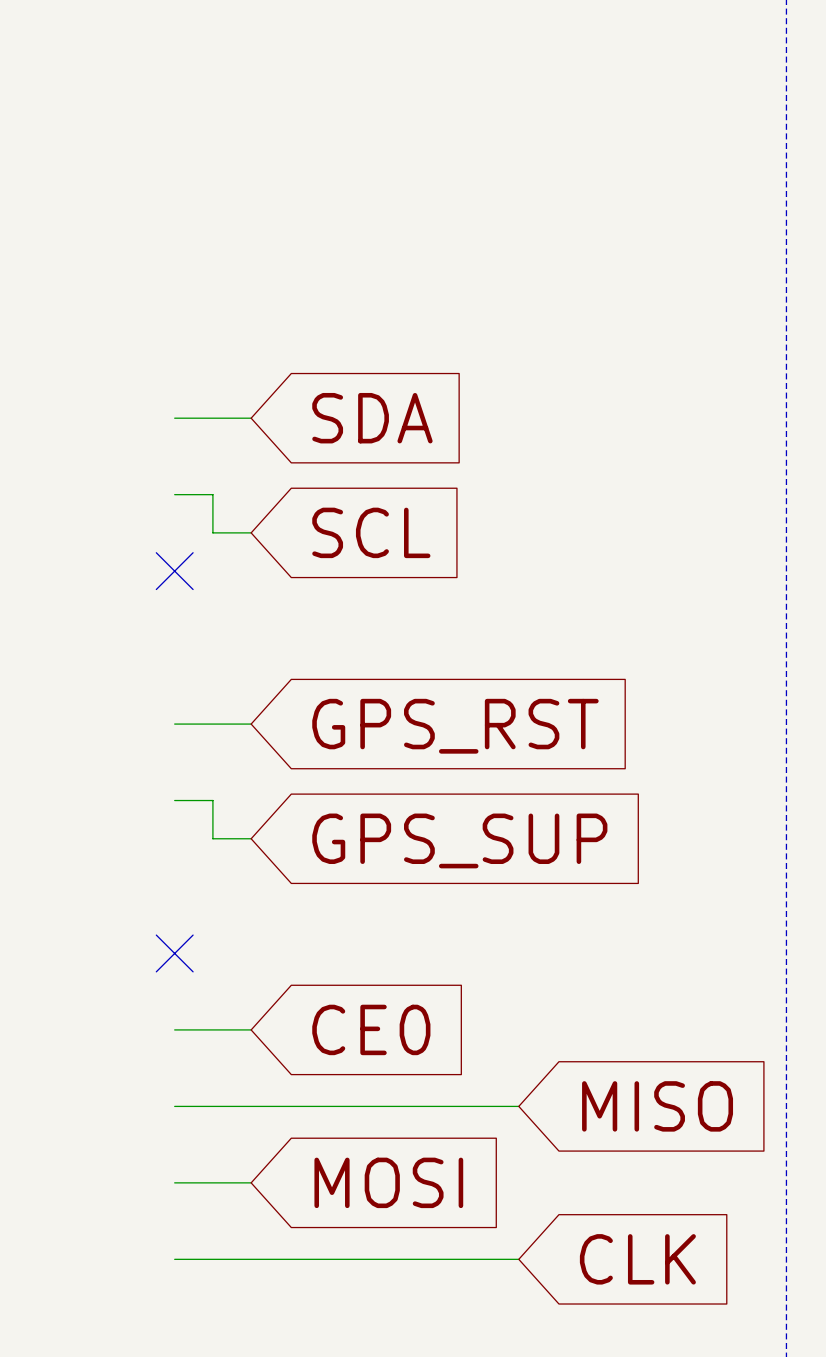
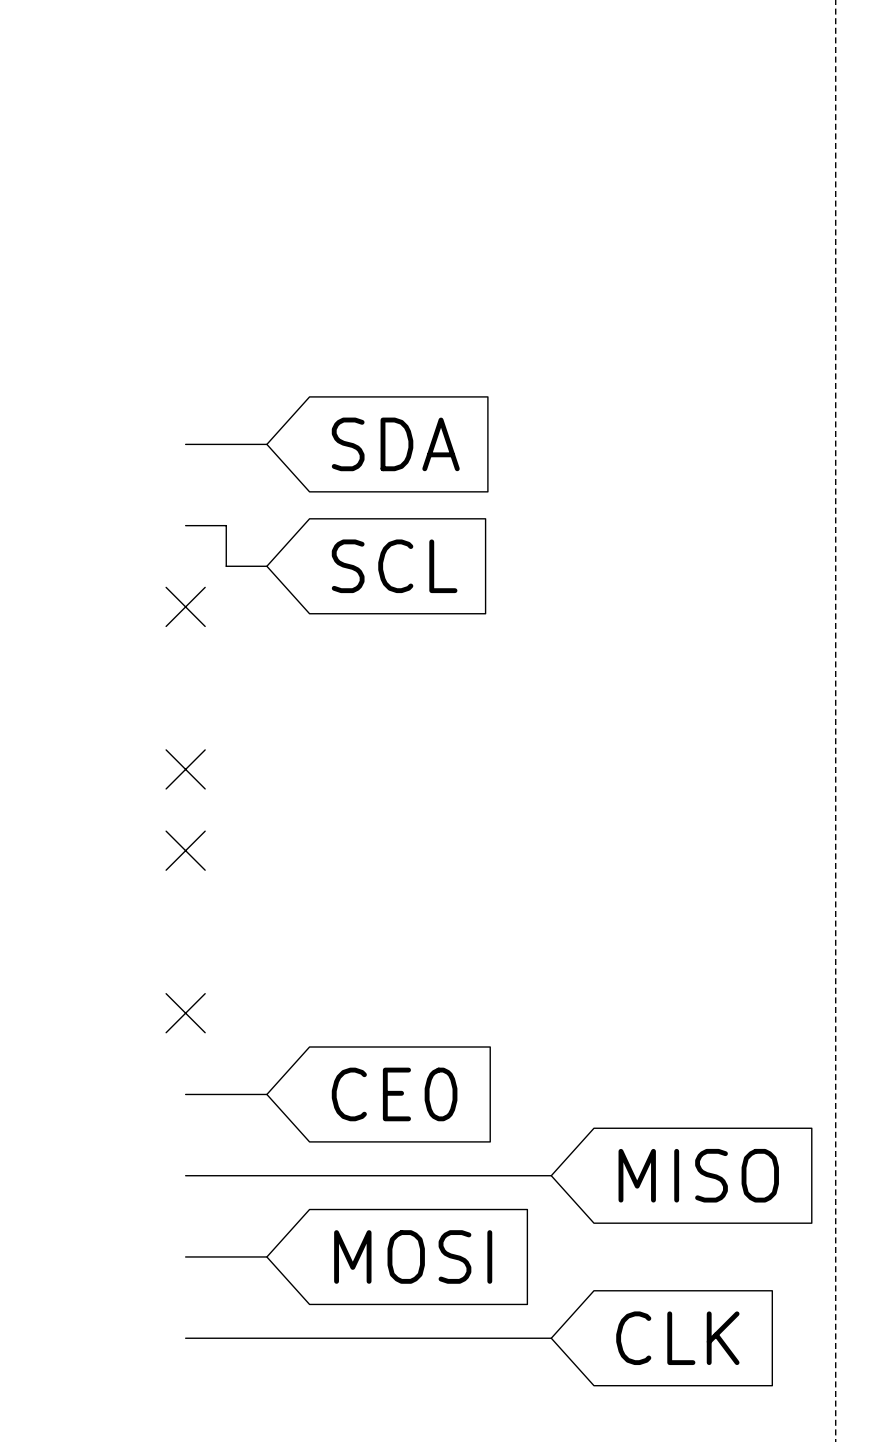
wire: (174, 724) (251, 724) -> none
no-connect mark: none -> (185, 769)
global label: GPS_RST (455, 726) -> none
wire: (174, 800) (212, 800) (212, 838) (251, 838) -> none
no-connect mark: none -> (185, 850)
global label: GPS_SUP (459, 840) -> none

